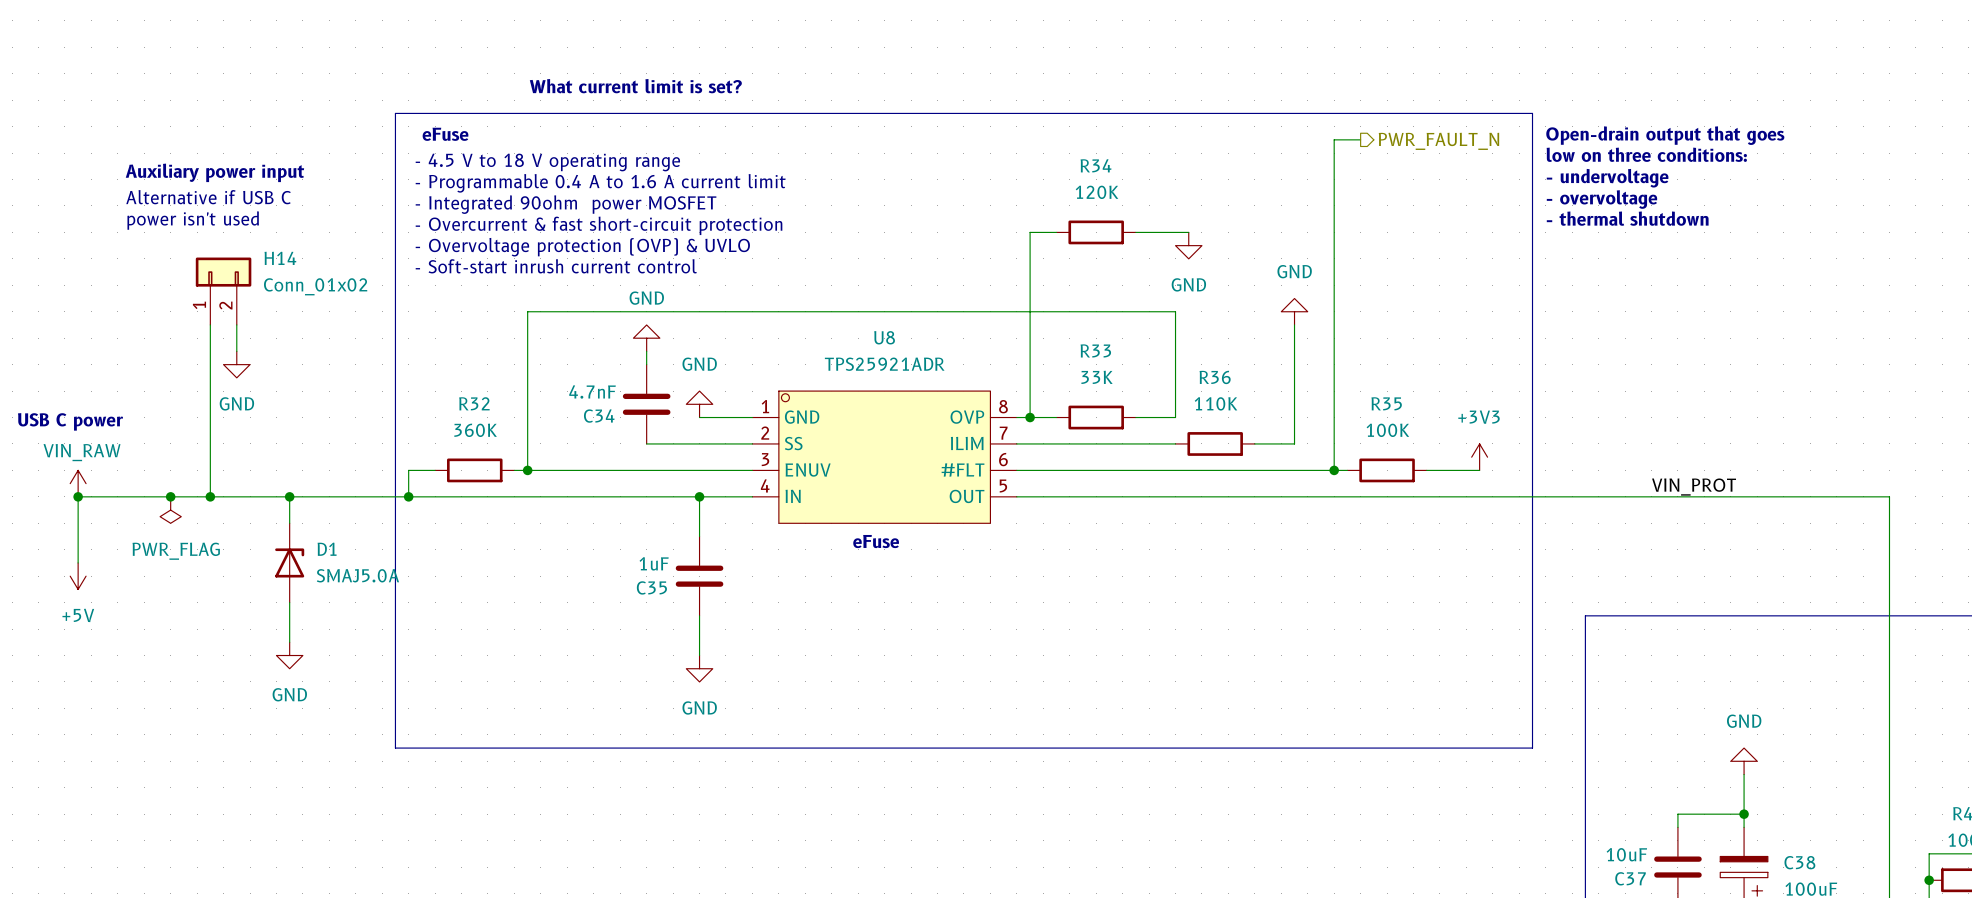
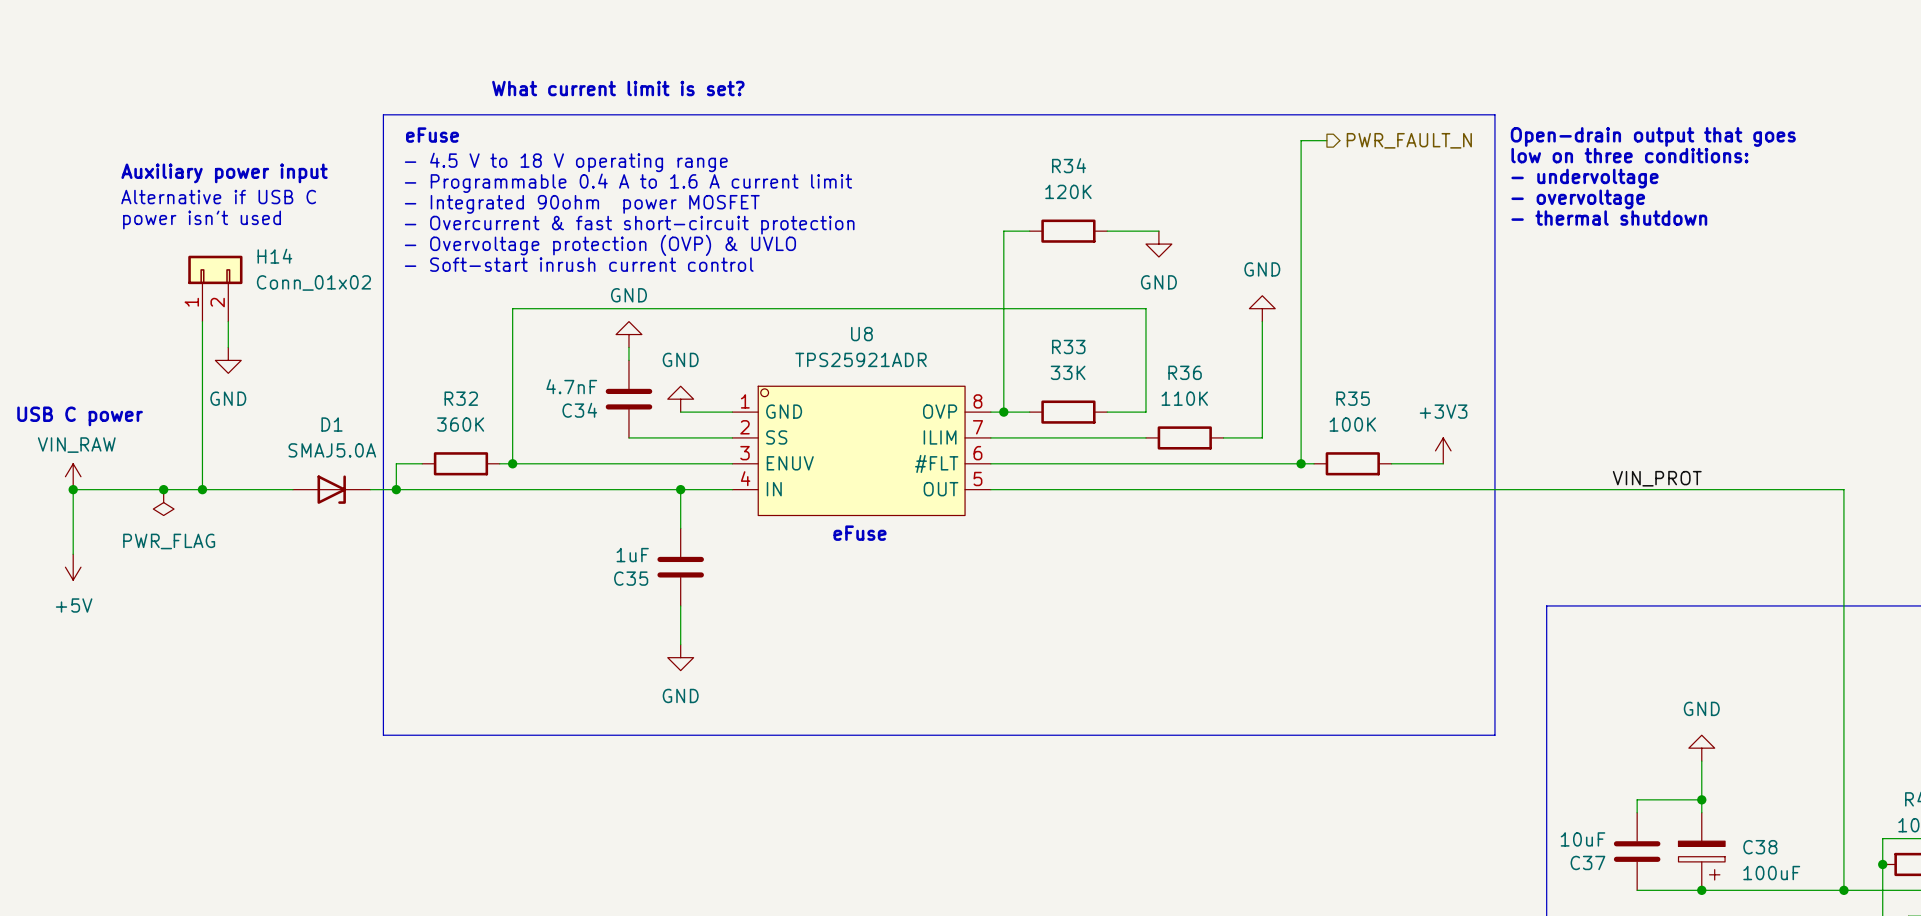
wire: (289, 496) (289, 523) -> none
junction: (289, 496) -> none
D1 name position: D1 (327, 549) -> D1 (332, 424)
D1 rotation: 0° (289, 562) -> 90° clockwise (331, 489)
D1 position: (289, 562) -> (331, 489)
D1 value position: SMAJ5.0A (357, 575) -> SMAJ5.0A (332, 450)
wire: (289, 602) (289, 642) -> none
power symbol: GND (289, 655) -> none

